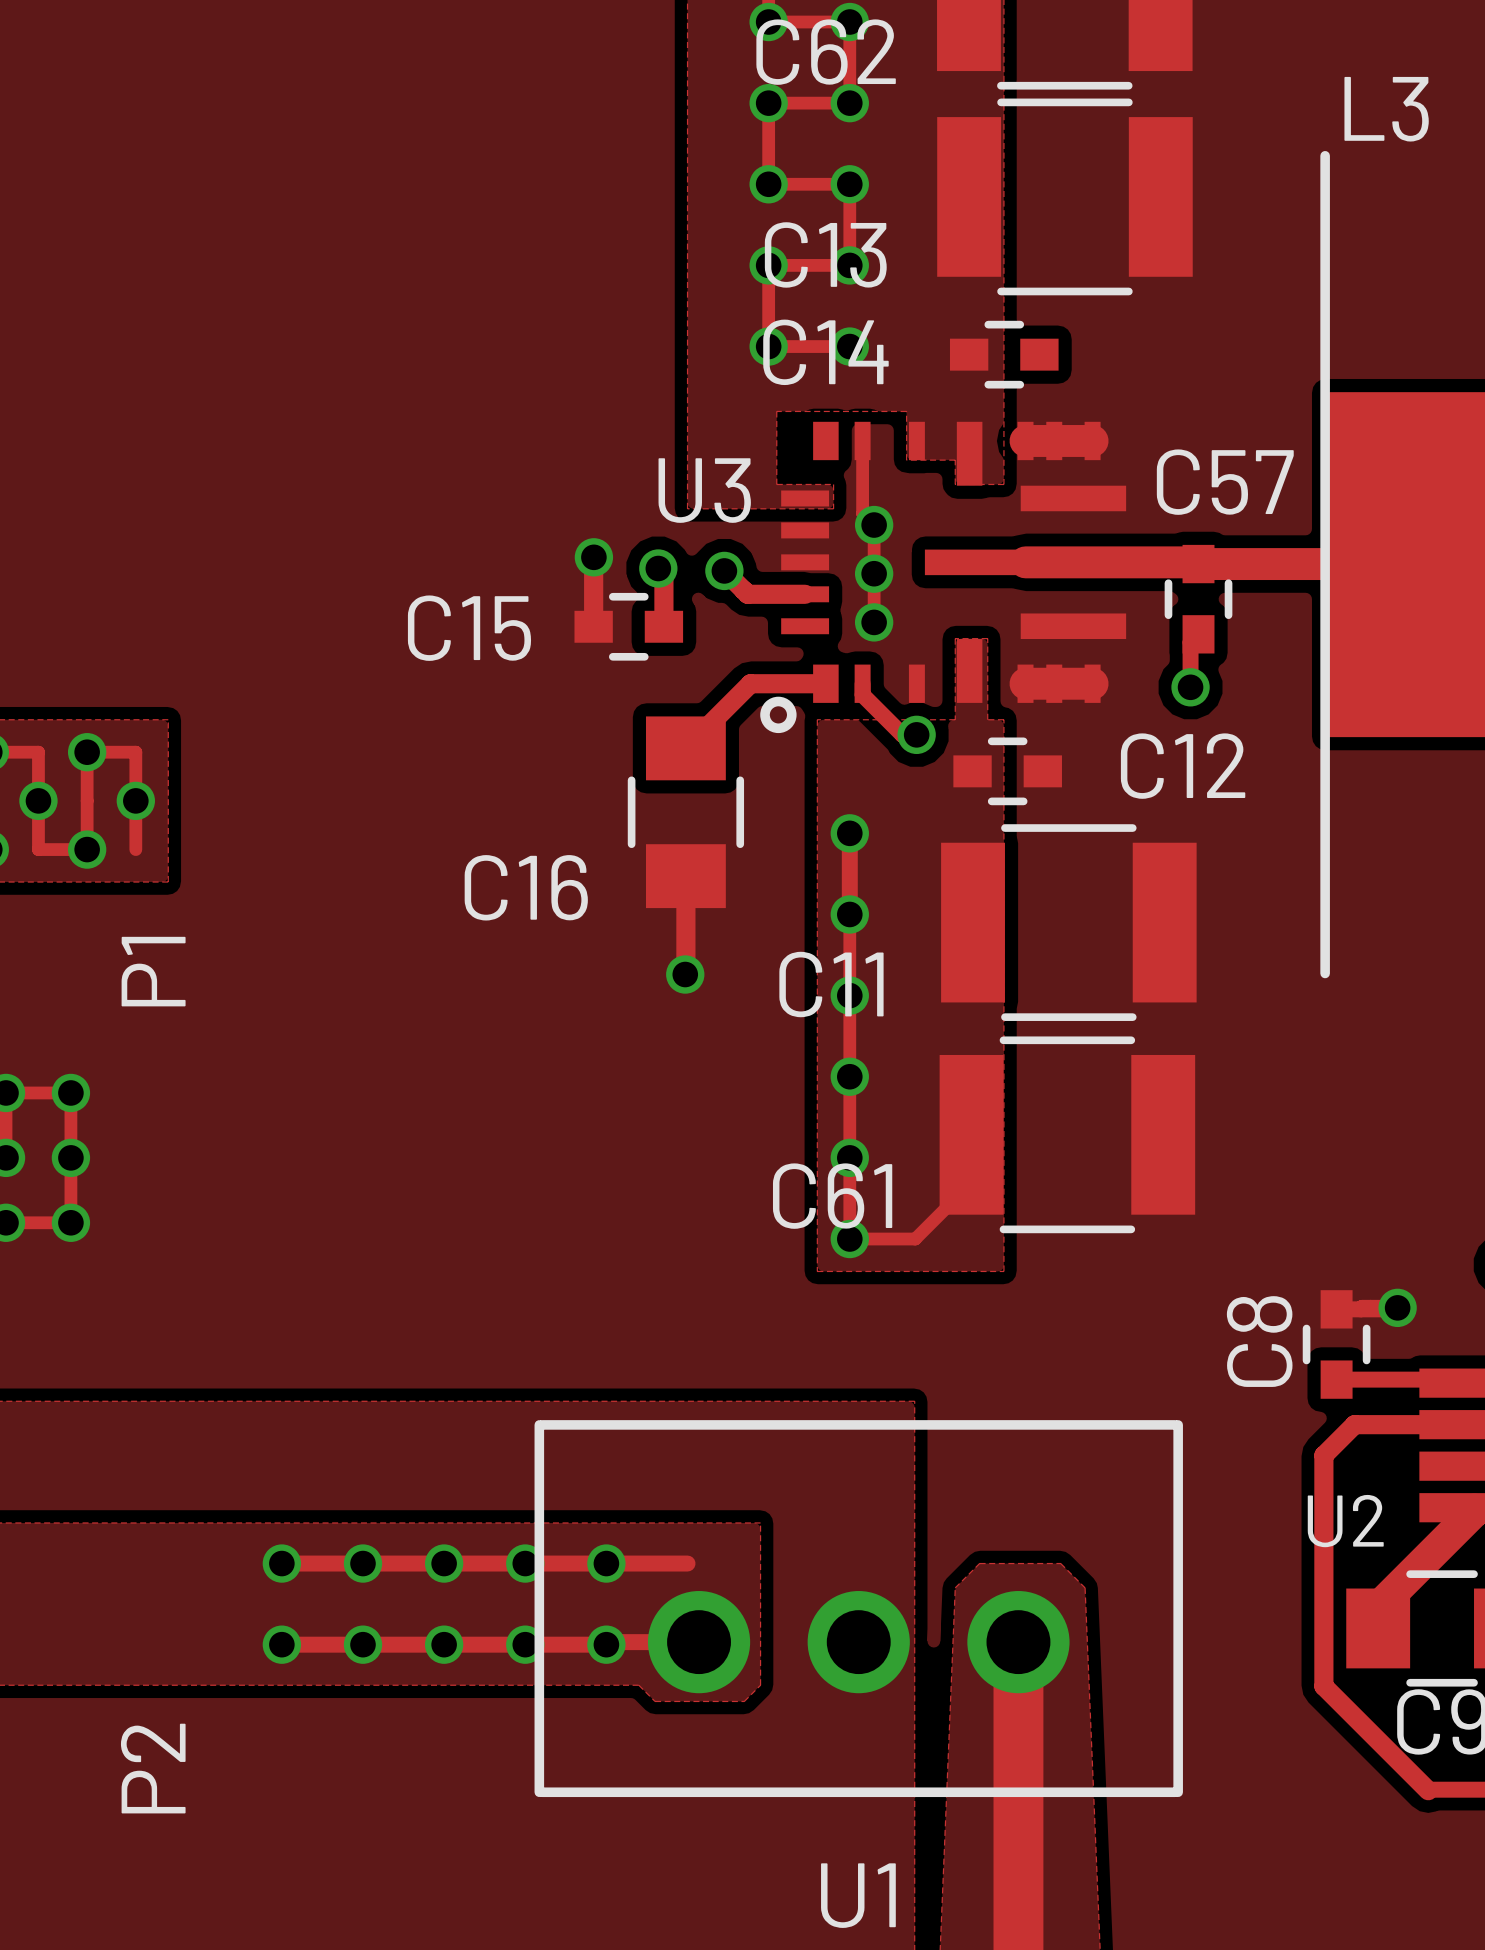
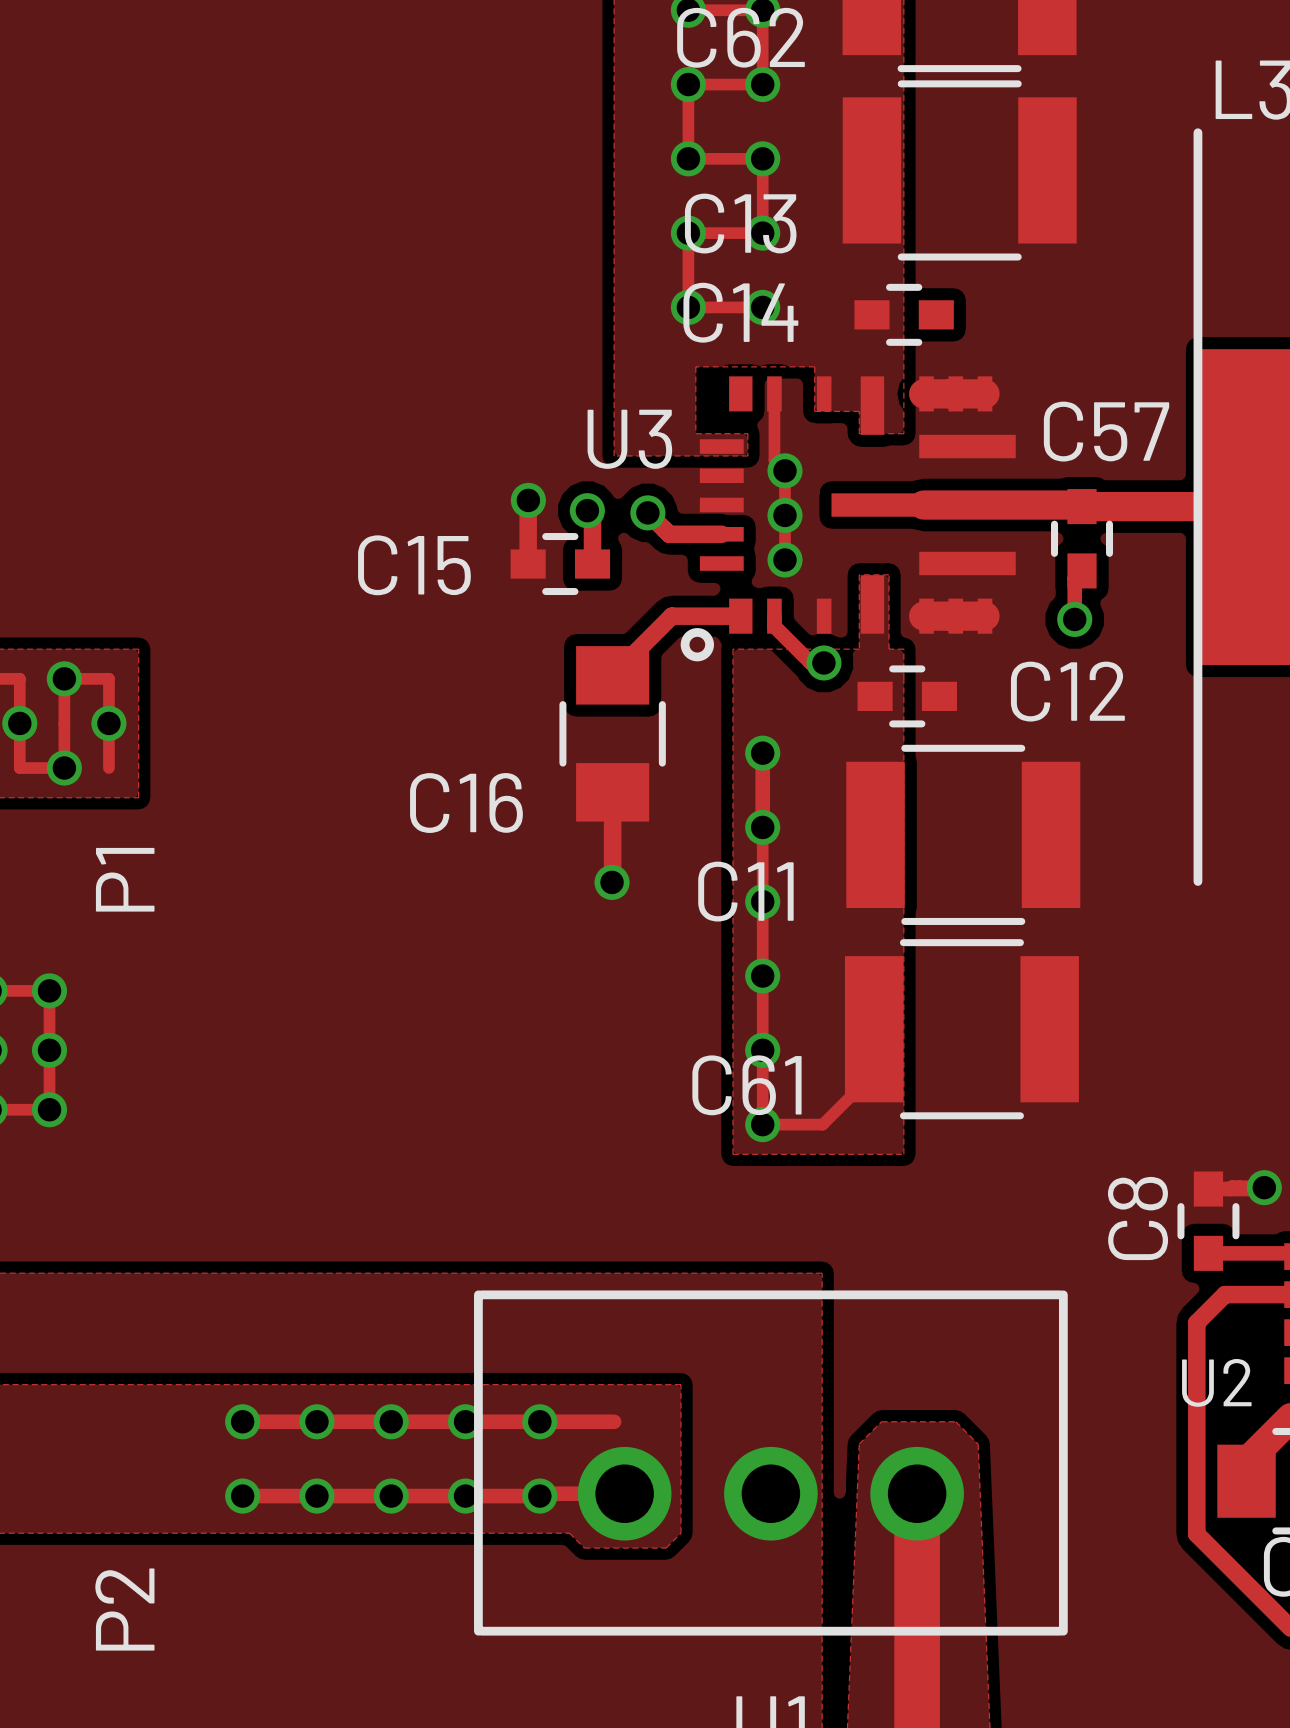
U3 footprint: [760, 421, 1127, 734] -> [680, 376, 1016, 662]

